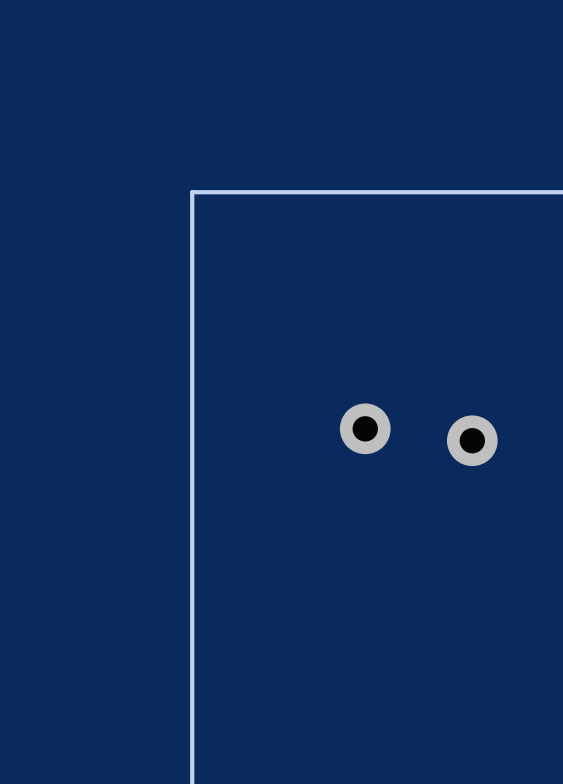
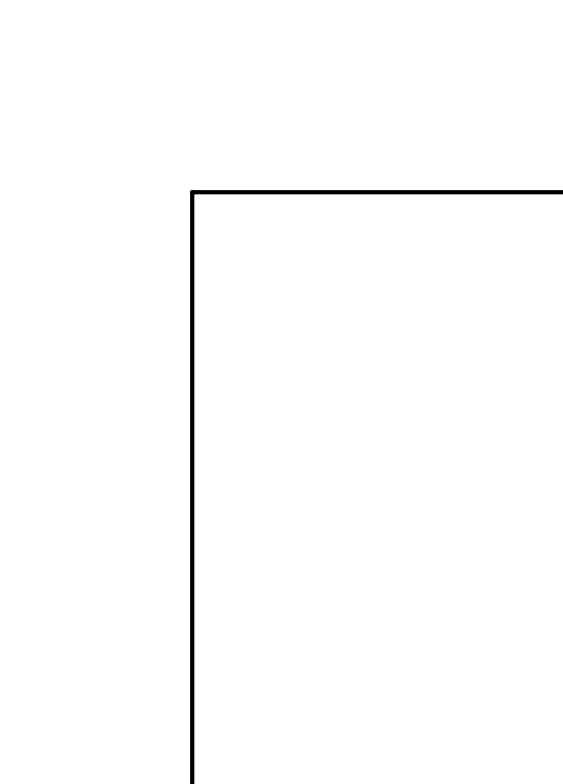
via: (365, 428) -> none
via: (472, 440) -> none

